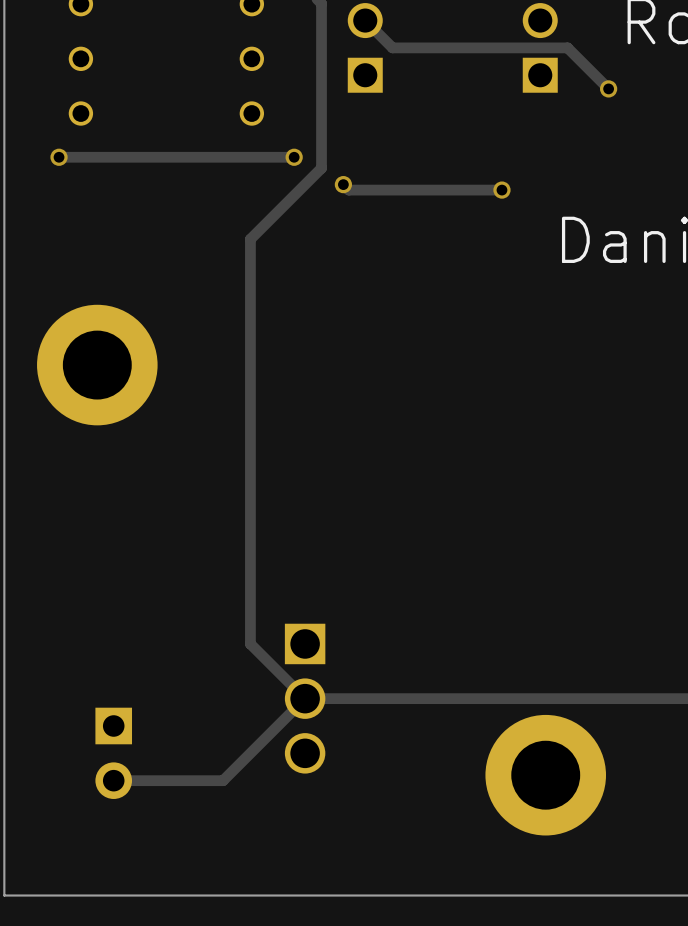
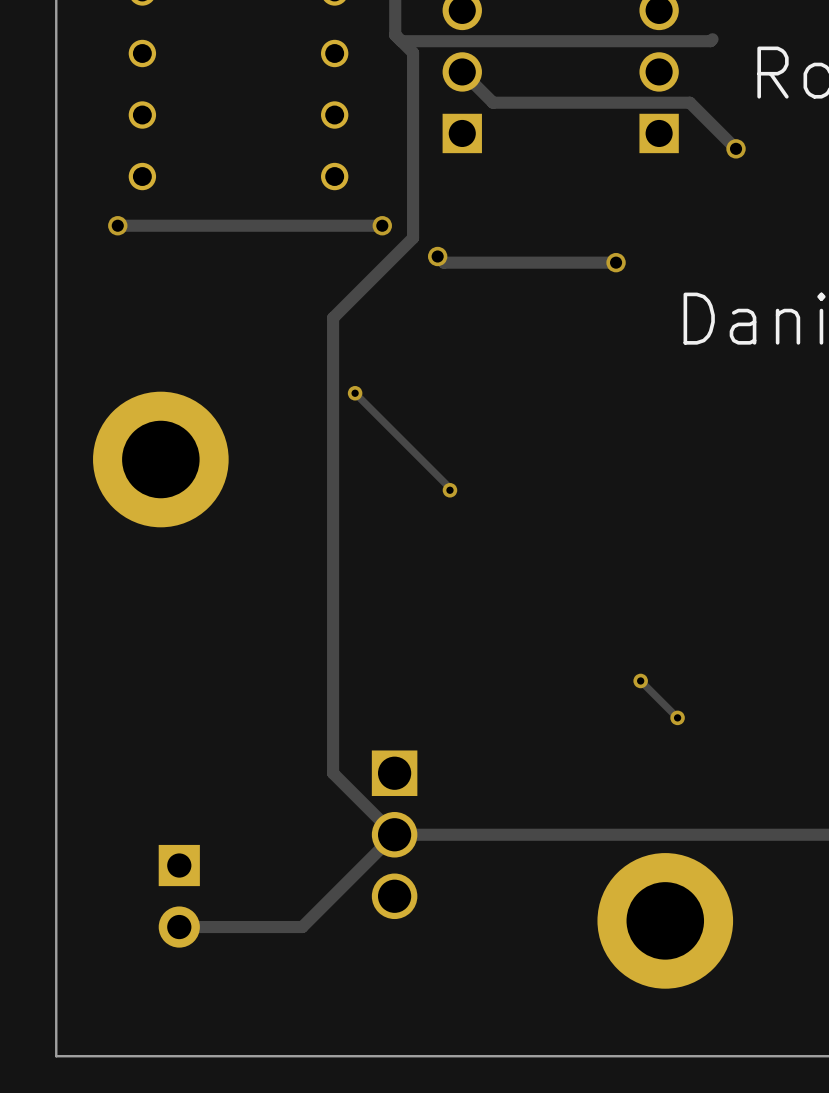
track: none -> (355, 393) (449, 488) (449, 490)
via: none -> (355, 393)
via: none -> (449, 490)
track: none -> (640, 680) (677, 717)
via: none -> (640, 680)
via: none -> (677, 717)

